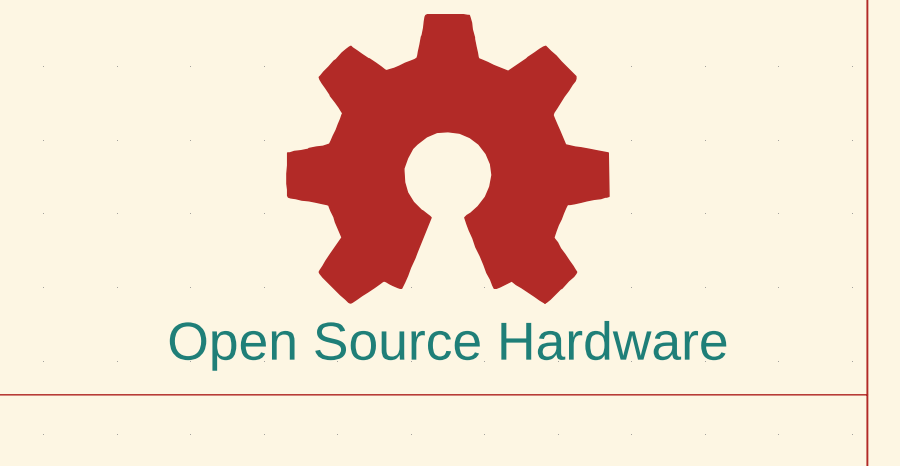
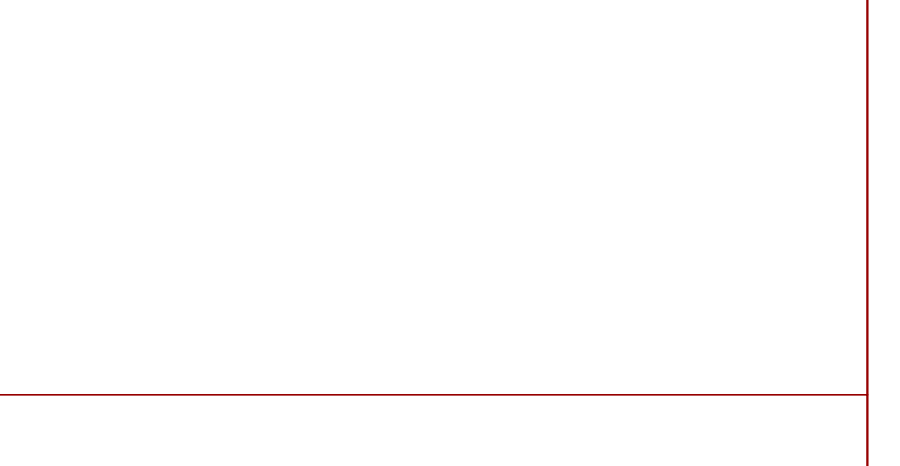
part: Open Source Hardware (447, 158) -> none

